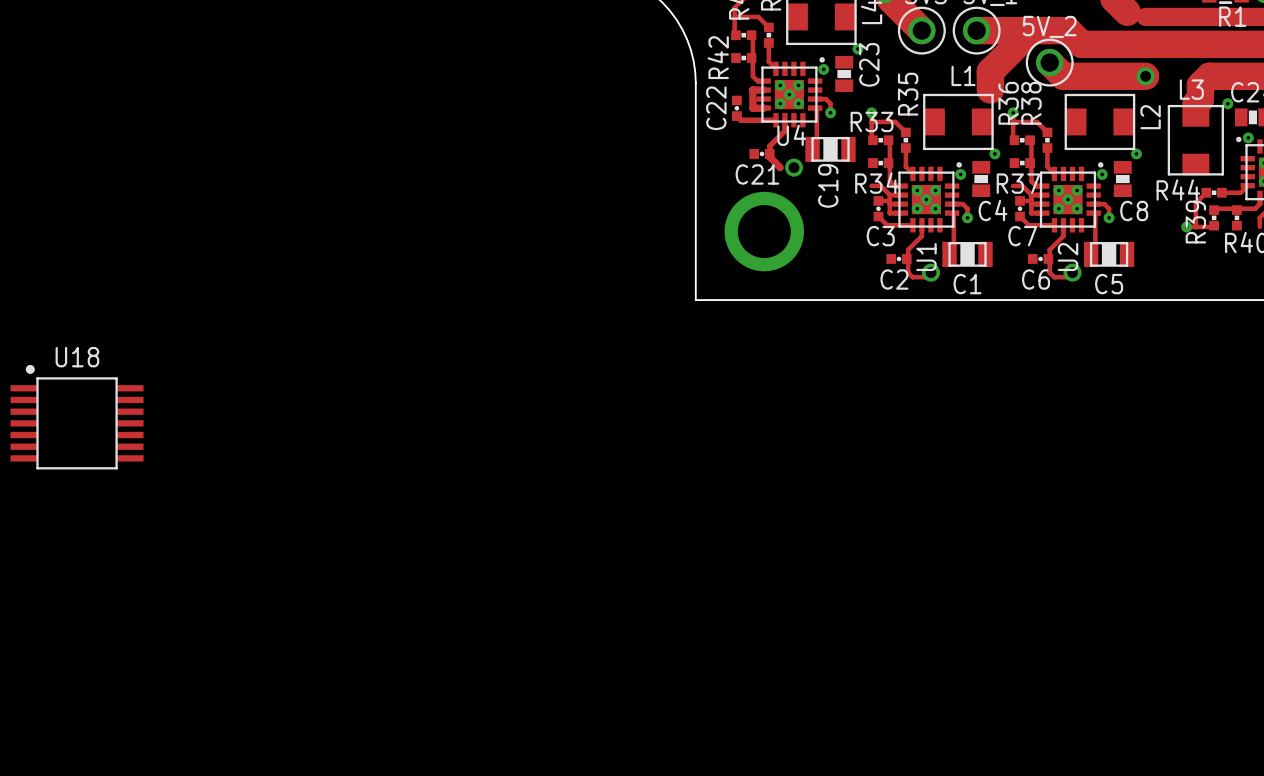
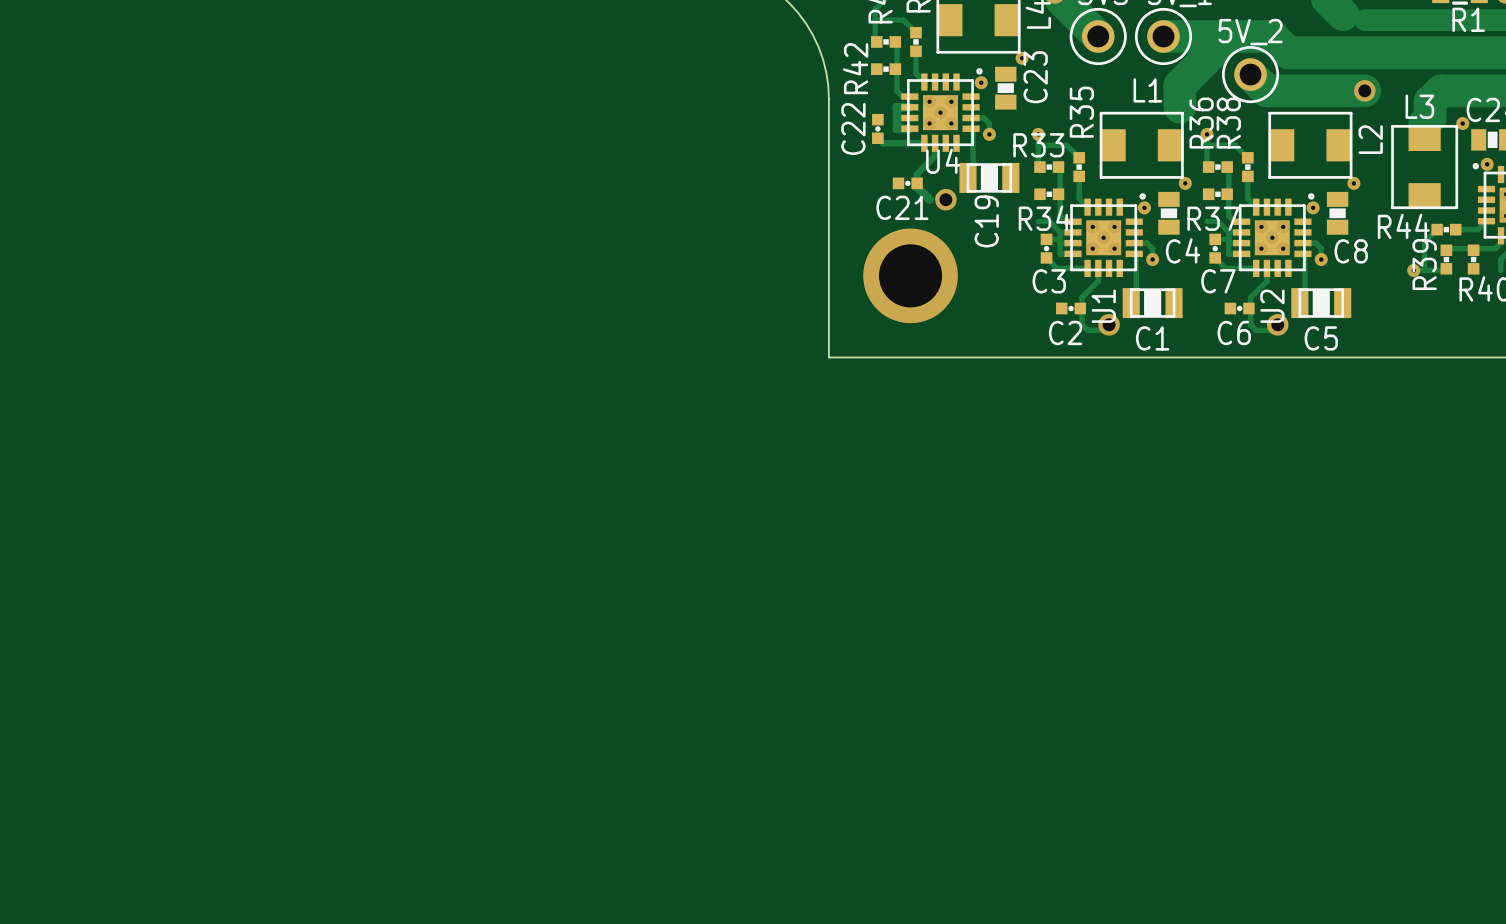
U18: (77, 417) -> none

